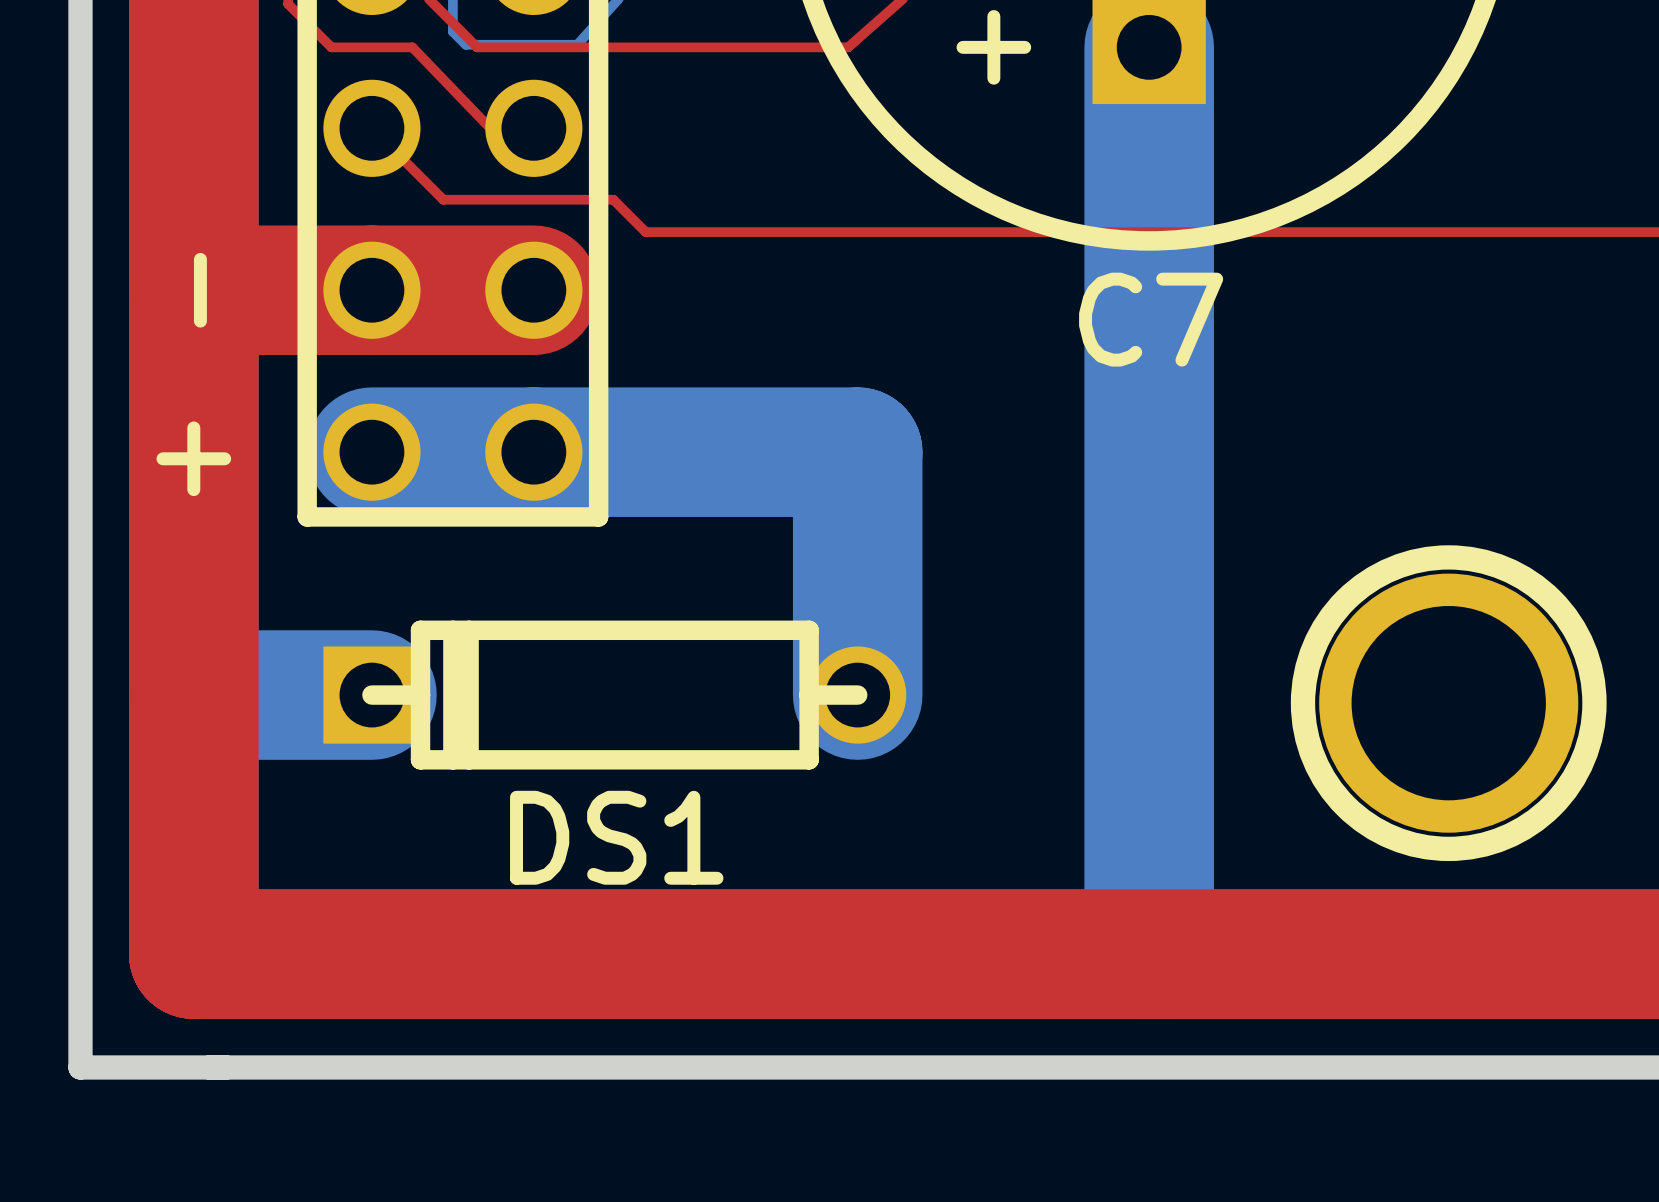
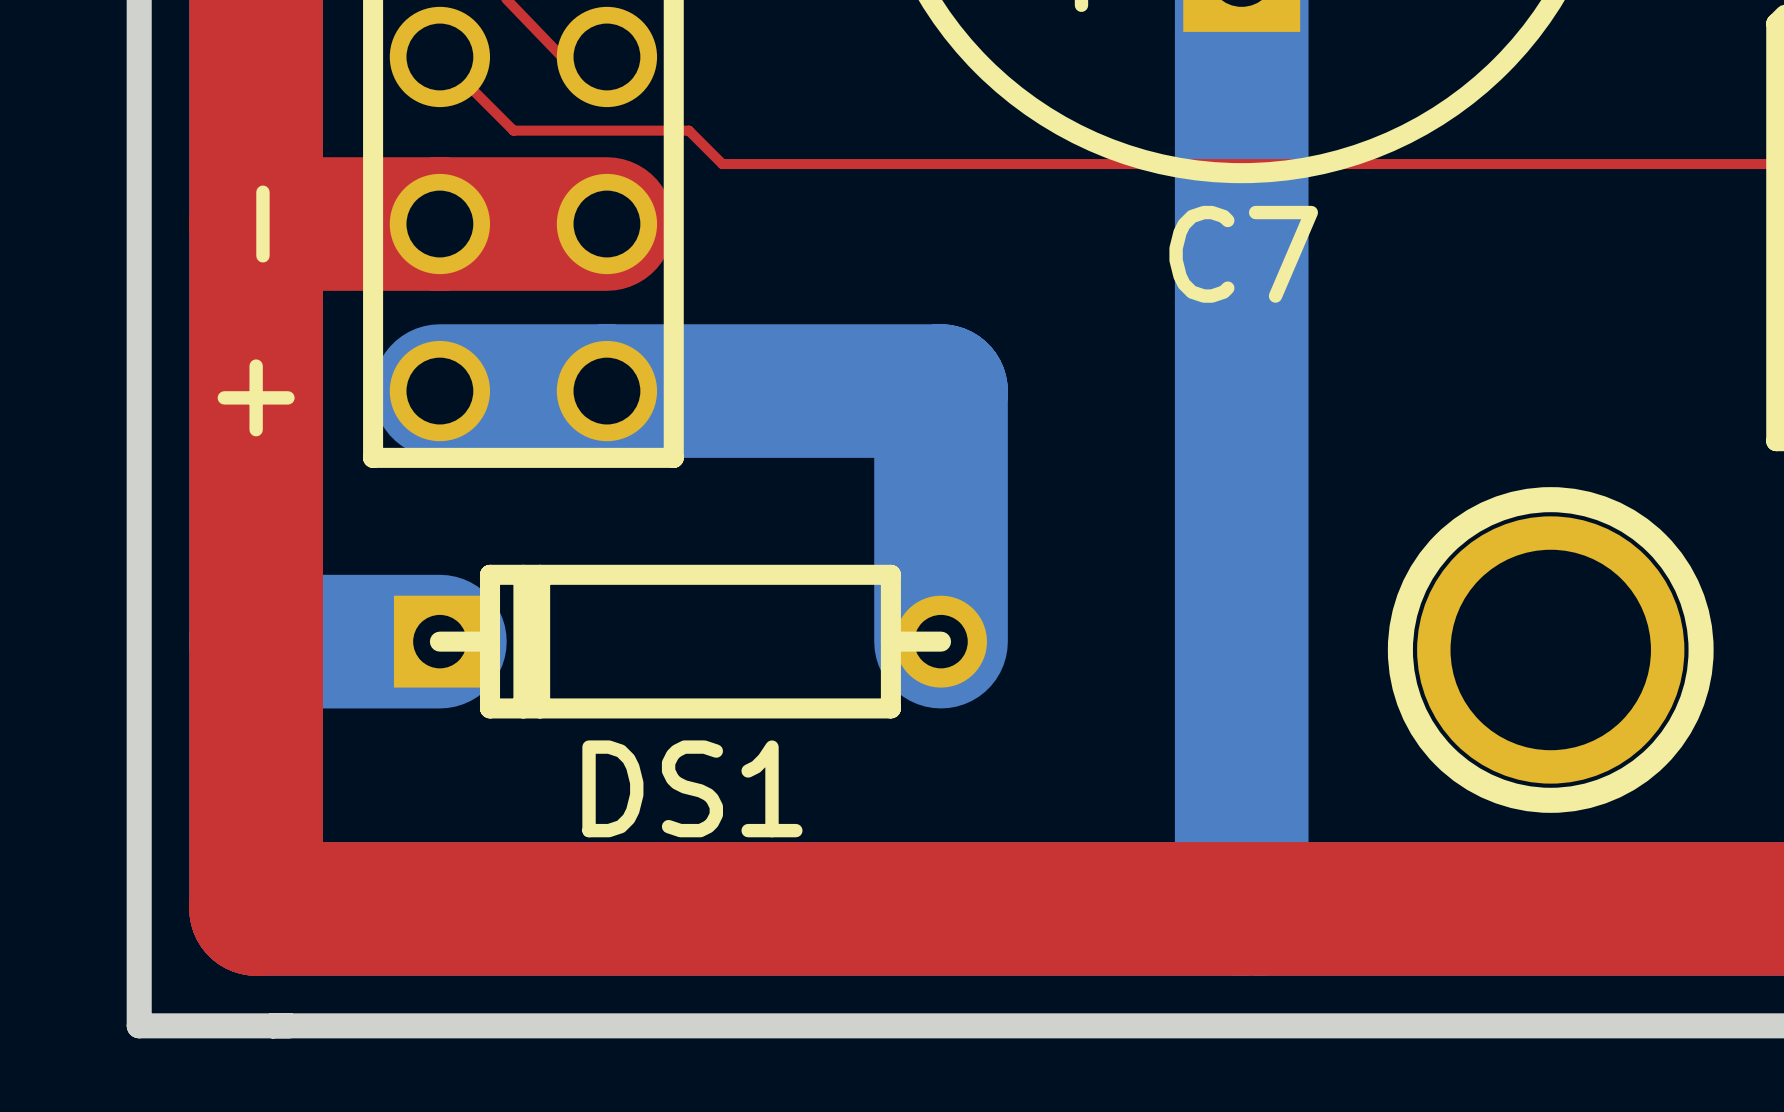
DS1 footprint: [323, 620, 907, 770] -> [393, 564, 987, 719]

